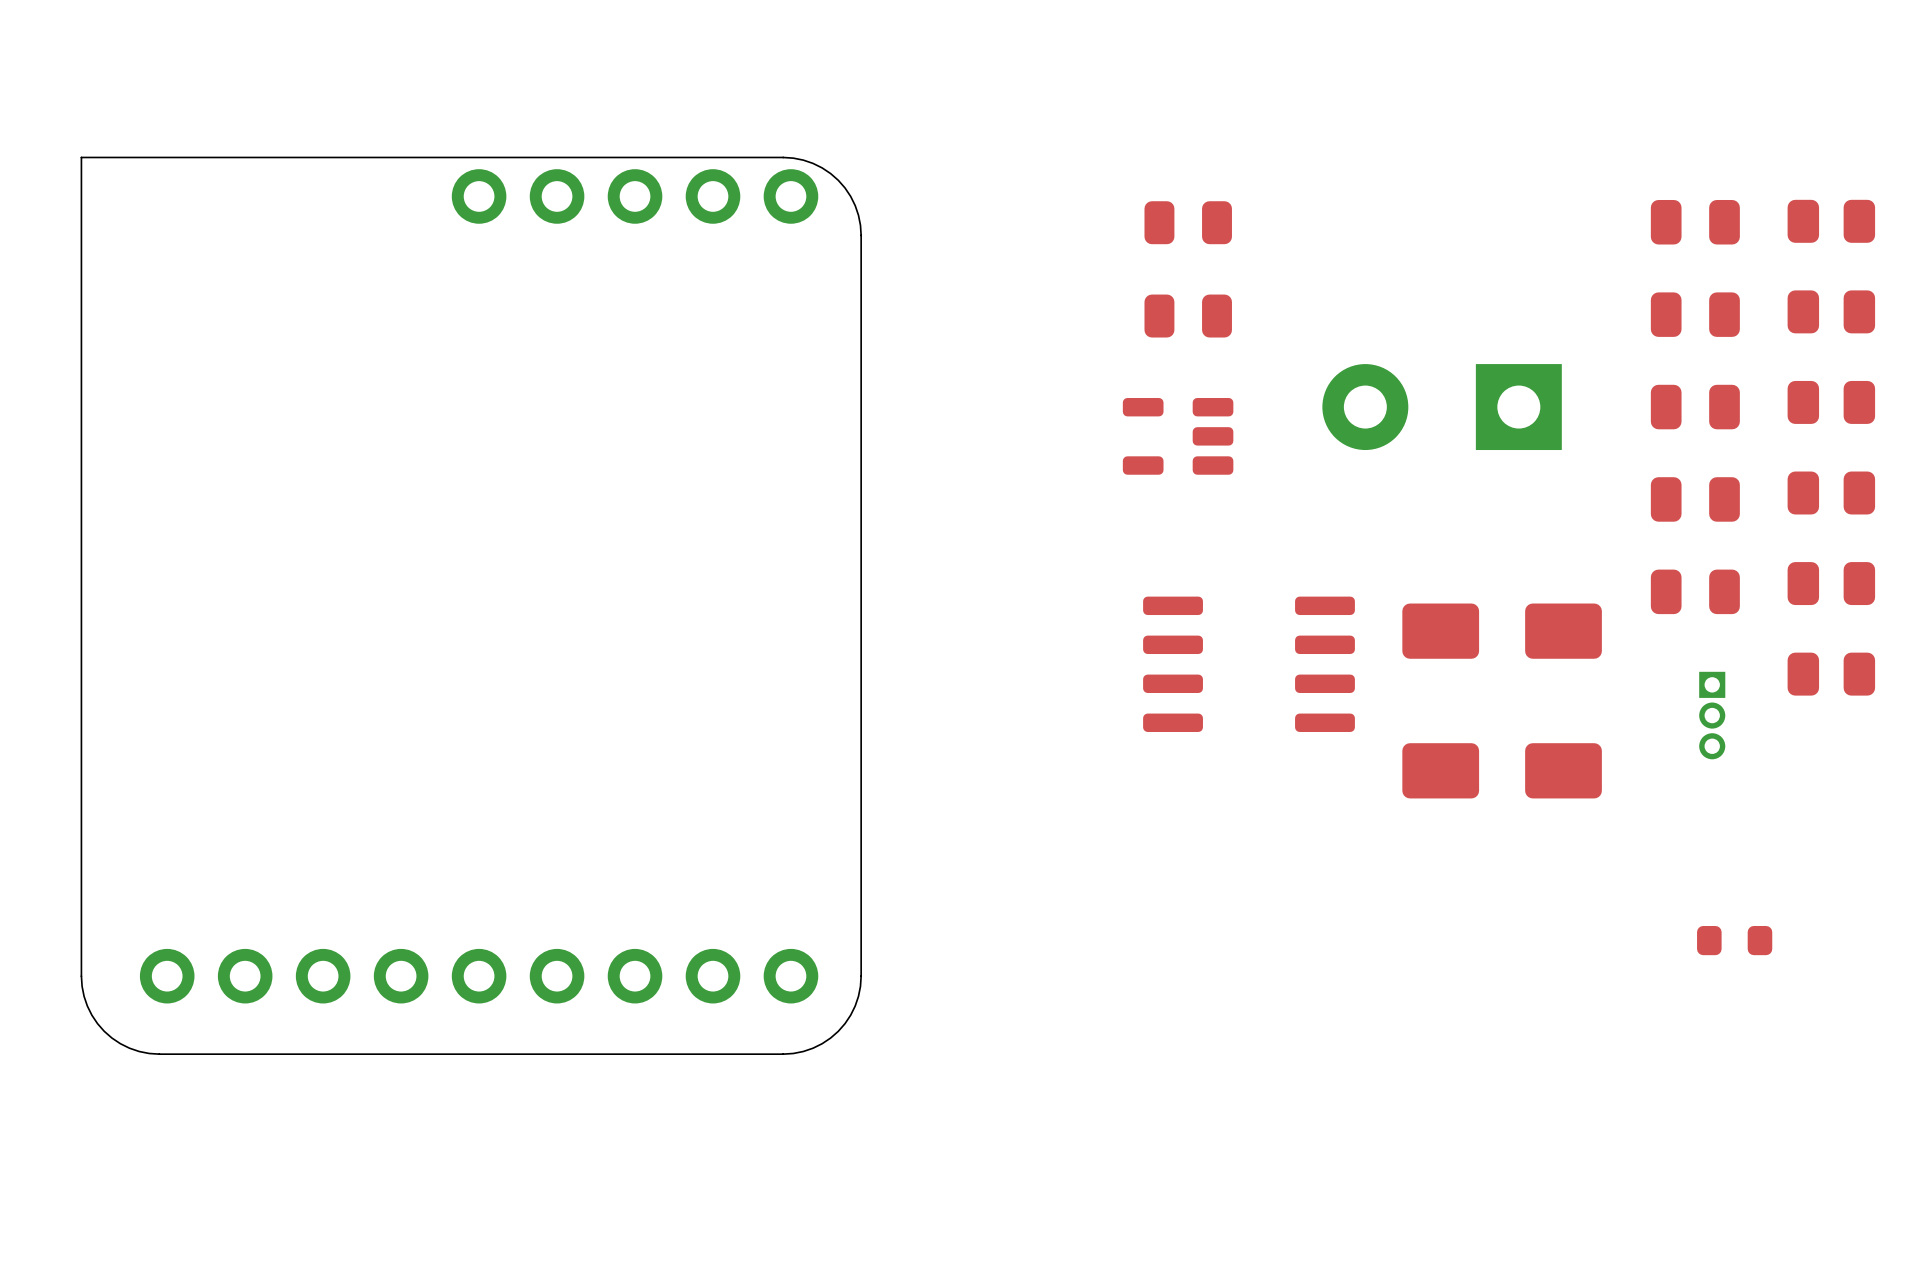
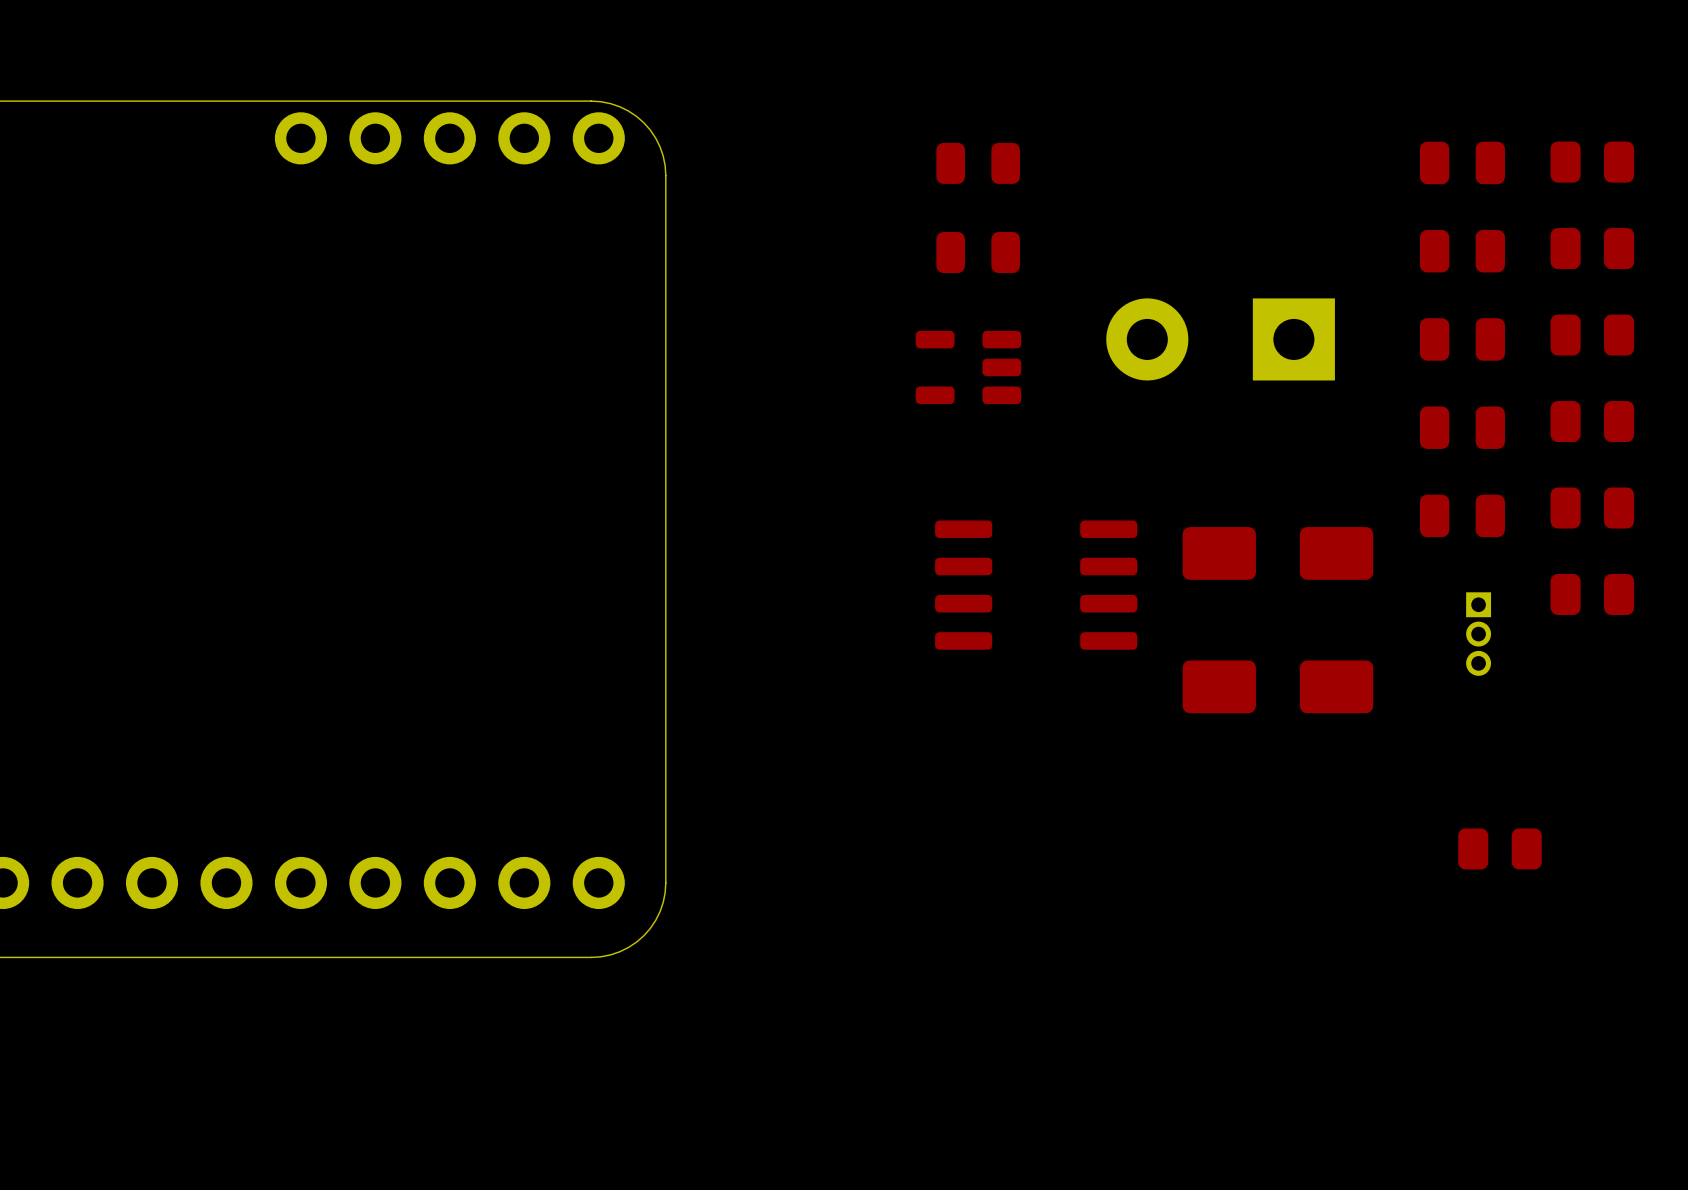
part footprint: [1697, 925, 1773, 956] -> [1458, 828, 1542, 870]

